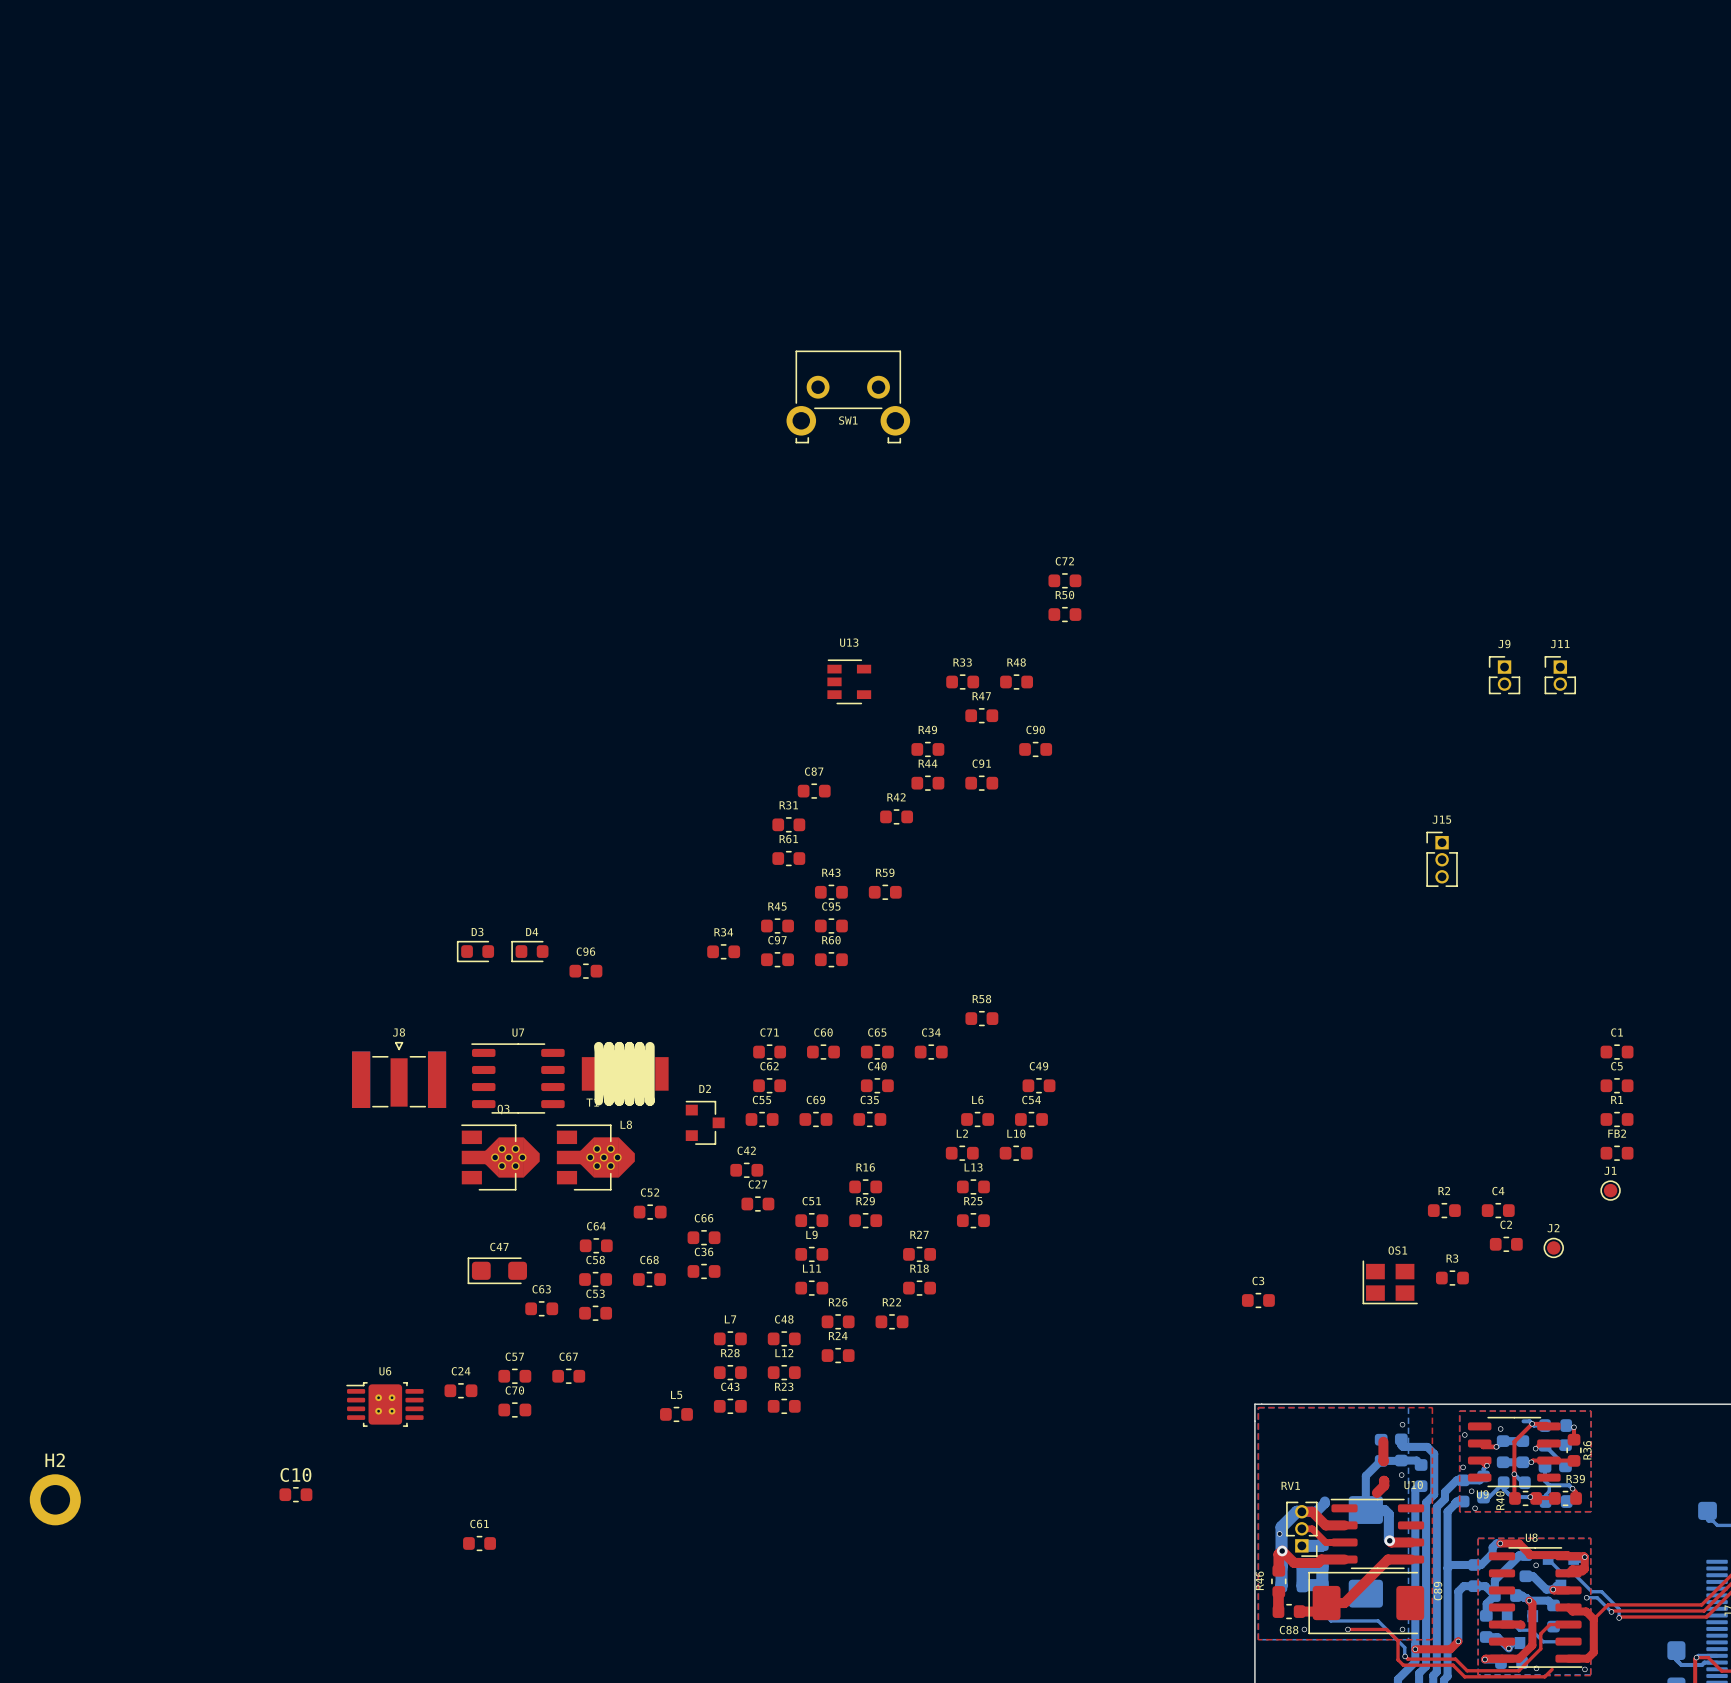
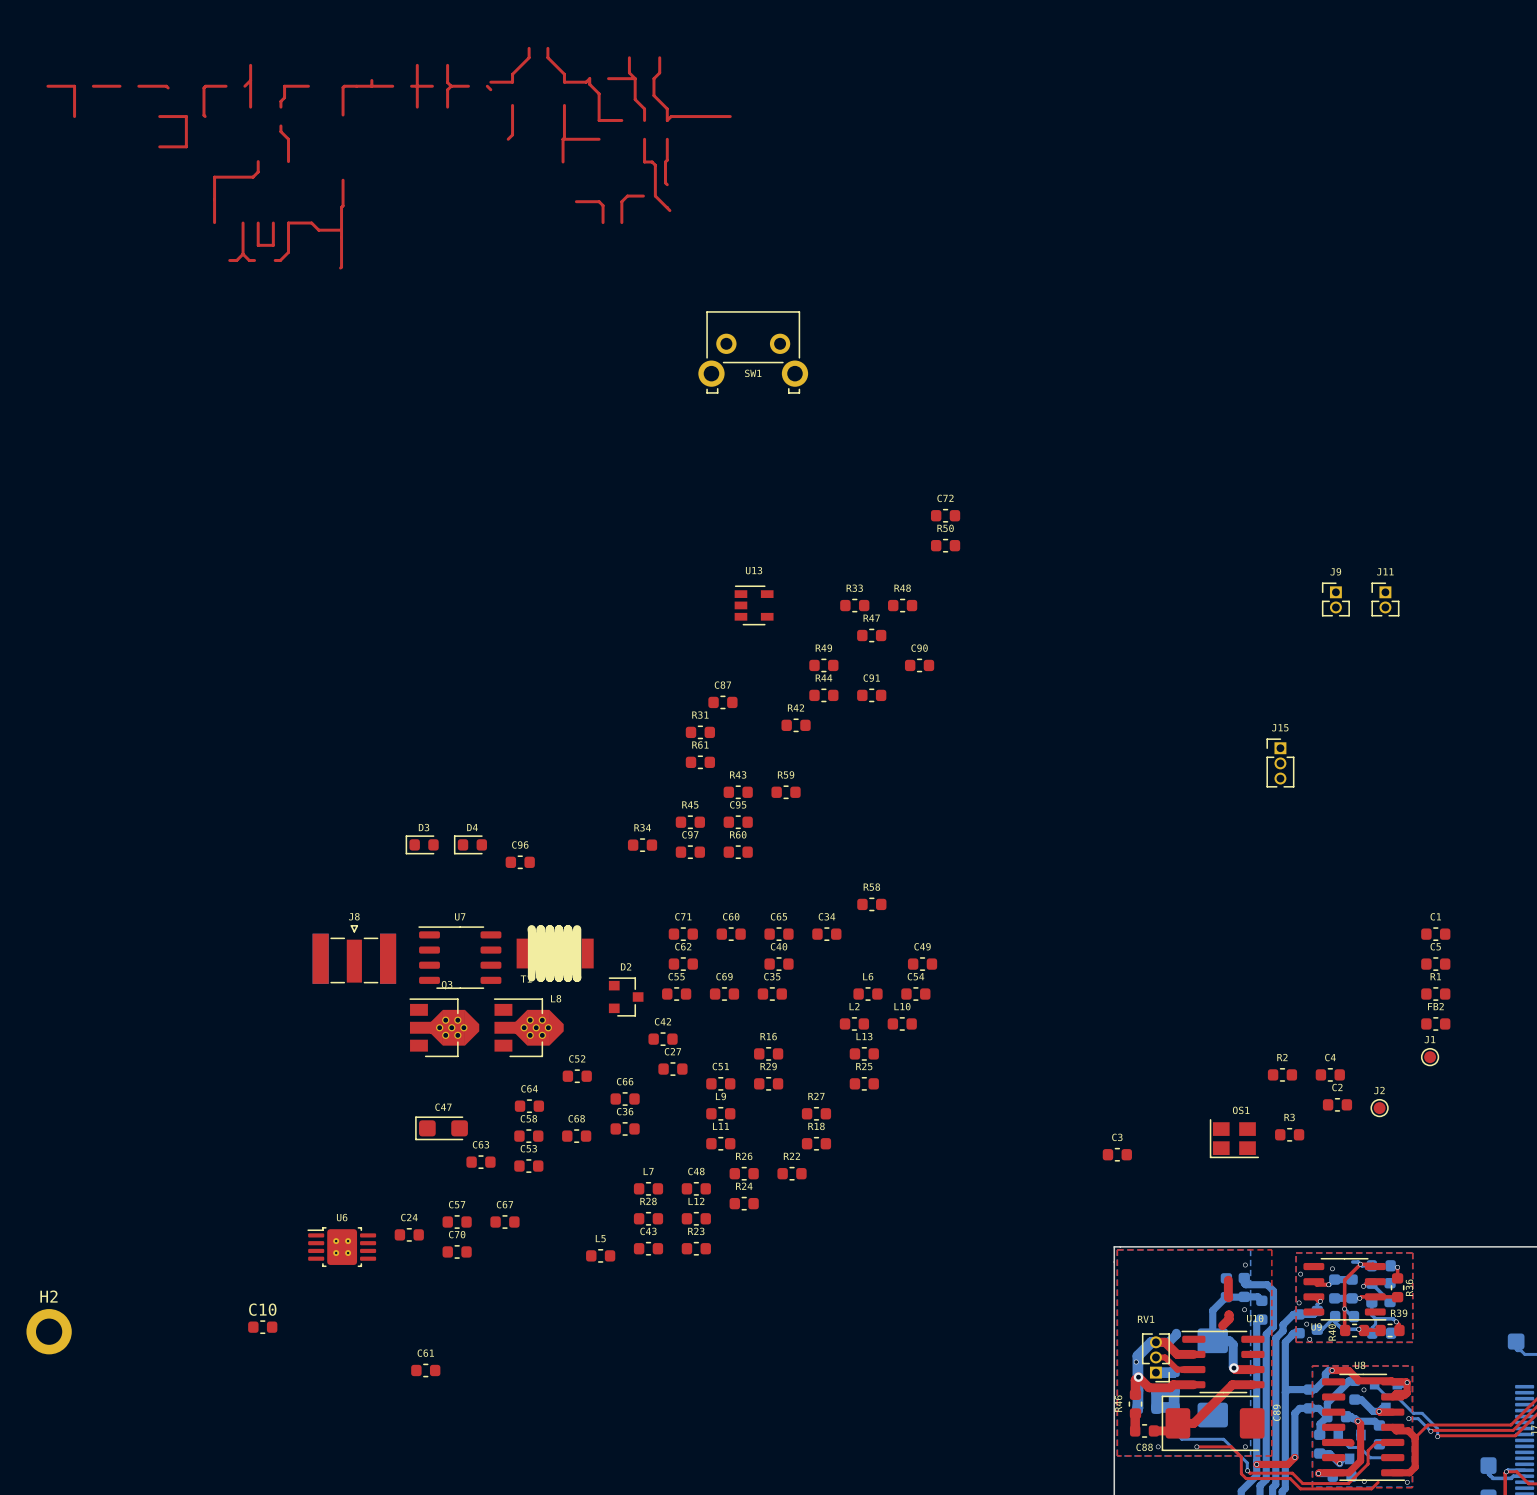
top track: none -> (529, 48) (529, 57) (512, 74) (512, 82) (490, 82)
top track: none -> (547, 48) (547, 57) (564, 74) (564, 82) (586, 82) (589, 78) (589, 84) (599, 93) (599, 120) (621, 120)
top track: none -> (629, 57) (629, 72) (635, 78)
top track: none -> (659, 57) (659, 72) (653, 78) (653, 95) (667, 108) (667, 120) (671, 116) (730, 116)
top track: none -> (250, 65) (250, 107)
top track: none -> (417, 65) (417, 107)
top track: none -> (447, 65) (447, 82) (451, 86)
top track: none -> (608, 78) (635, 78)
top track: none -> (635, 78) (635, 99) (644, 108) (644, 120)
top track: none -> (250, 80) (244, 86)
top track: none -> (371, 80) (371, 86)
top track: none -> (47, 86) (74, 86) (74, 116)
top track: none -> (93, 86) (120, 86)
top track: none -> (138, 86) (166, 86) (168, 87)
top track: none -> (226, 86) (205, 86) (203, 87) (205, 116)
top track: none -> (308, 86) (284, 86) (284, 97) (280, 101) (280, 107)
top track: none -> (392, 86) (344, 86) (343, 115)
top track: none -> (411, 86) (432, 86)
top track: none -> (451, 86) (468, 86)
top track: none -> (451, 86) (447, 89) (447, 107)
top track: none -> (487, 86) (490, 89)
top track: none -> (512, 105) (512, 134) (508, 139)
top track: none -> (564, 105) (563, 139)
top track: none -> (159, 116) (186, 116) (186, 146) (159, 146)
top track: none -> (280, 125) (280, 131) (288, 139) (288, 161)
top track: none -> (563, 139) (599, 139)
top track: none -> (563, 139) (563, 162)
top track: none -> (644, 139) (644, 162) (652, 162) (655, 165) (655, 196) (669, 210)
top track: none -> (667, 139) (667, 160) (665, 162) (665, 182) (667, 184)
top track: none -> (258, 161) (258, 172) (253, 177) (214, 177) (214, 222)
top track: none -> (343, 180) (340, 268)
top track: none -> (643, 196) (627, 196) (621, 201) (621, 222)
top track: none -> (576, 201) (599, 201) (603, 205) (603, 222)
top track: none -> (243, 223) (243, 254)
top track: none -> (258, 223) (258, 245) (273, 245) (273, 223)
top track: none -> (341, 230) (318, 230) (311, 223) (288, 223) (288, 252) (280, 260) (275, 260)
top track: none -> (243, 254) (249, 260) (254, 260)
top track: none -> (243, 254) (236, 260) (229, 260)

